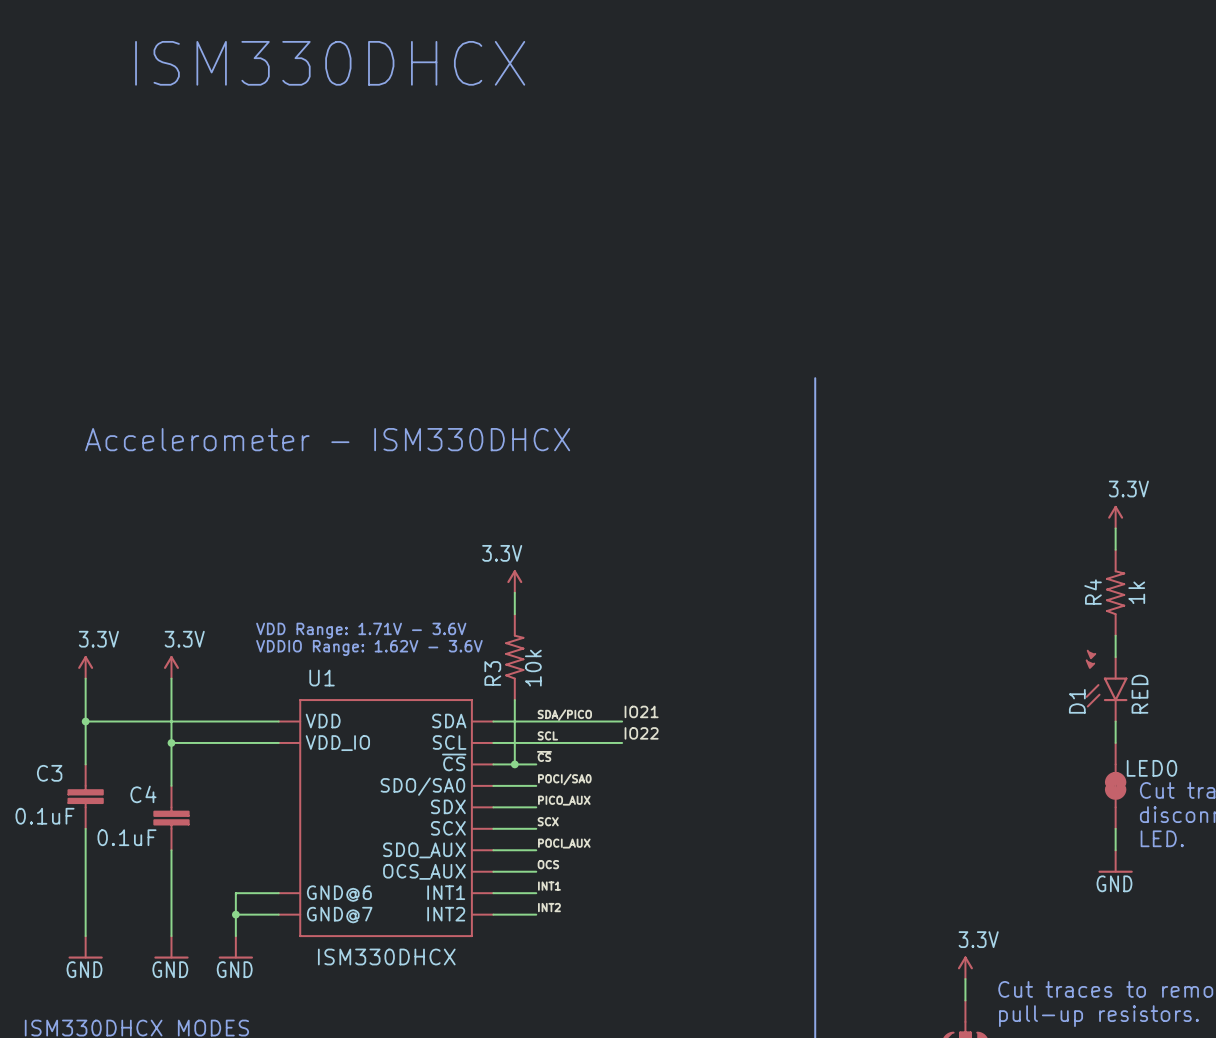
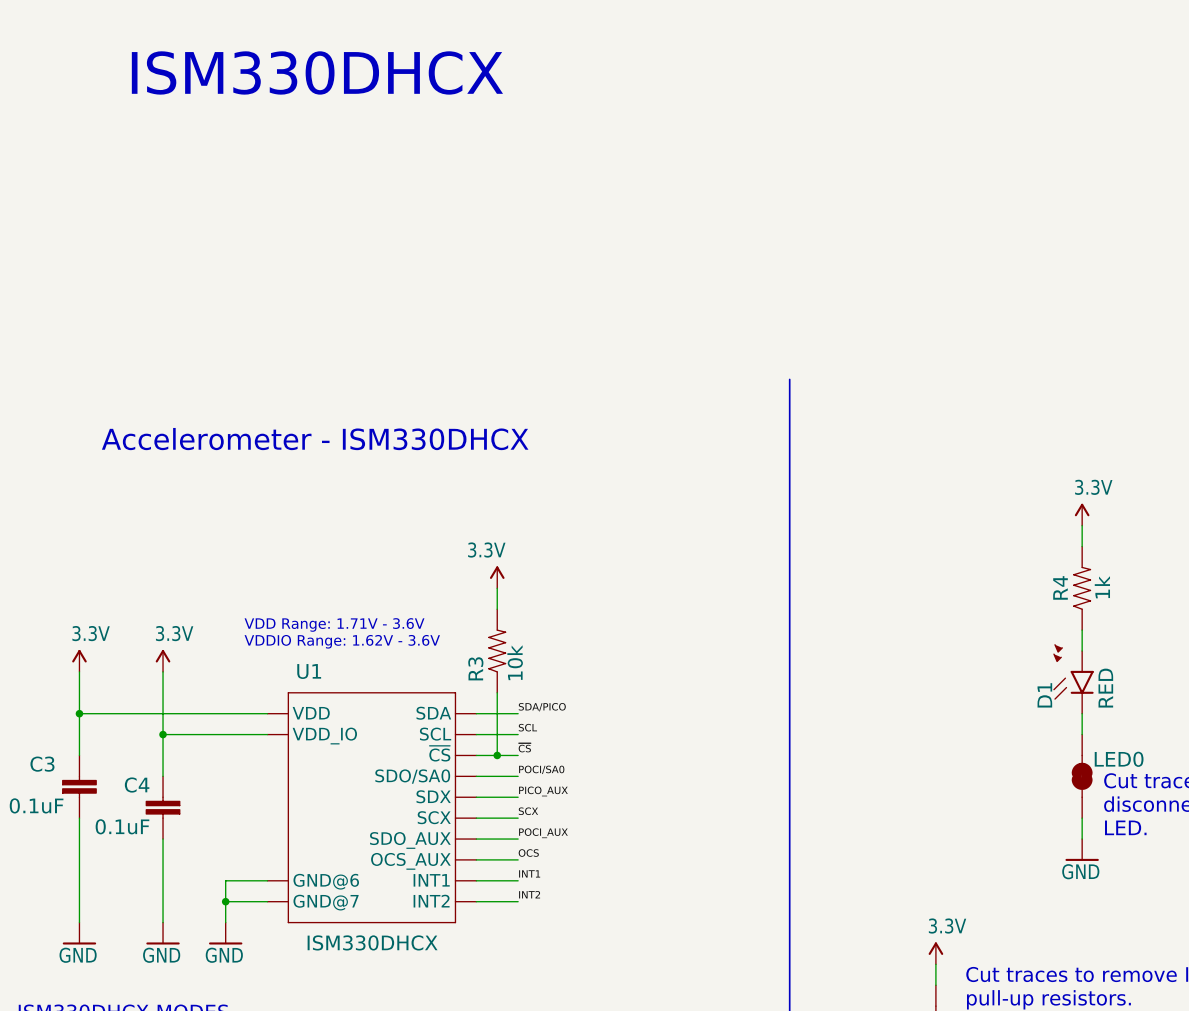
label: IO21 (641, 711) -> none
wire: (536, 721) (622, 721) -> none
label: IO22 (641, 733) -> none
wire: (536, 742) (622, 742) -> none

